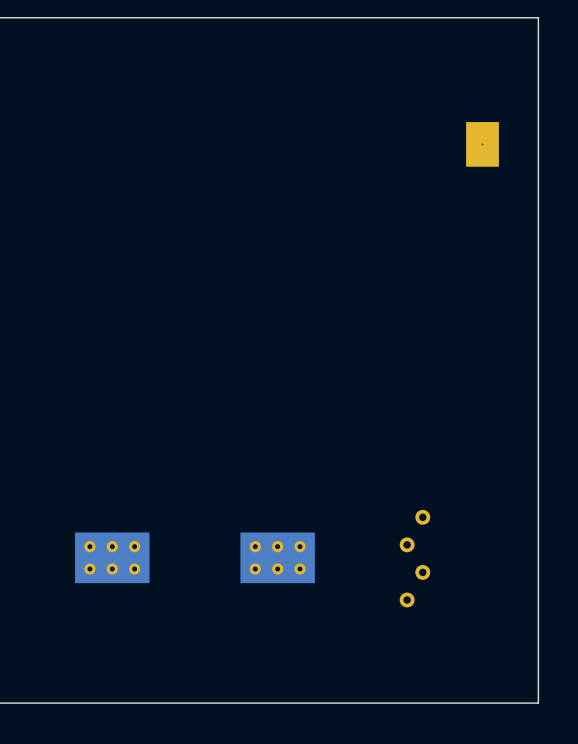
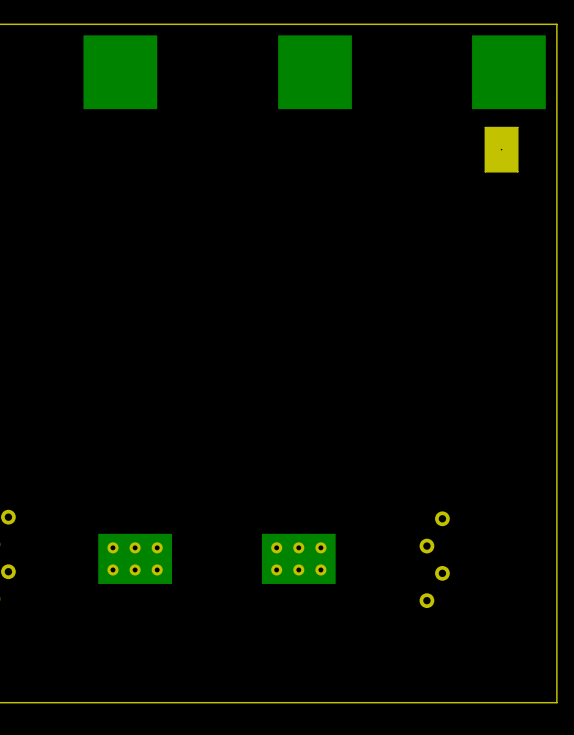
part: none -> (120, 72)
part: none -> (315, 72)
part: none -> (508, 72)
board edge: none -> (517, 127) (517, 171) (485, 171) (485, 127) (517, 127)

